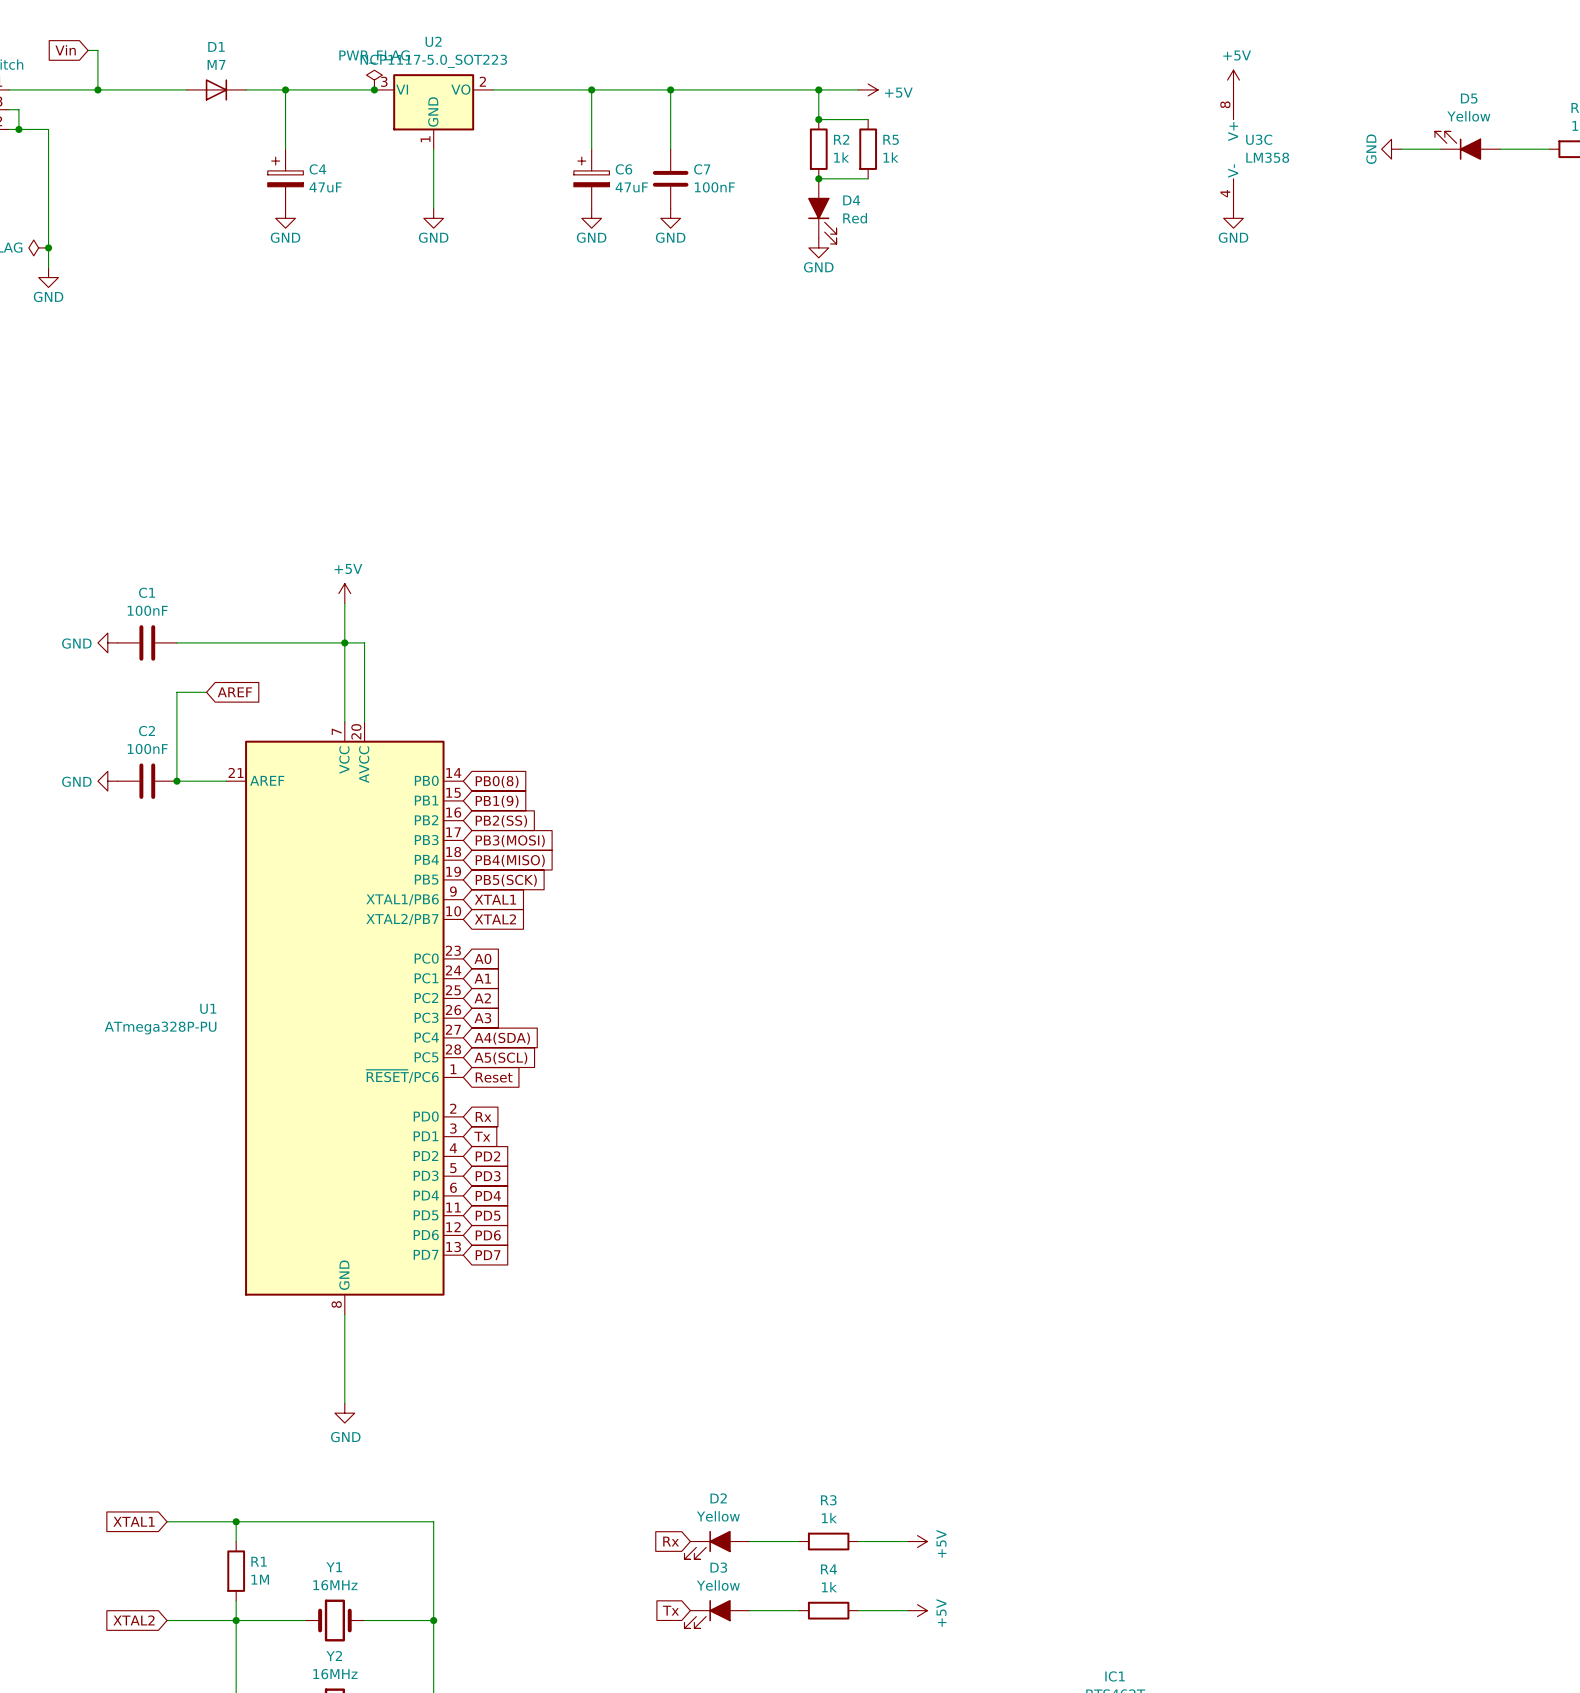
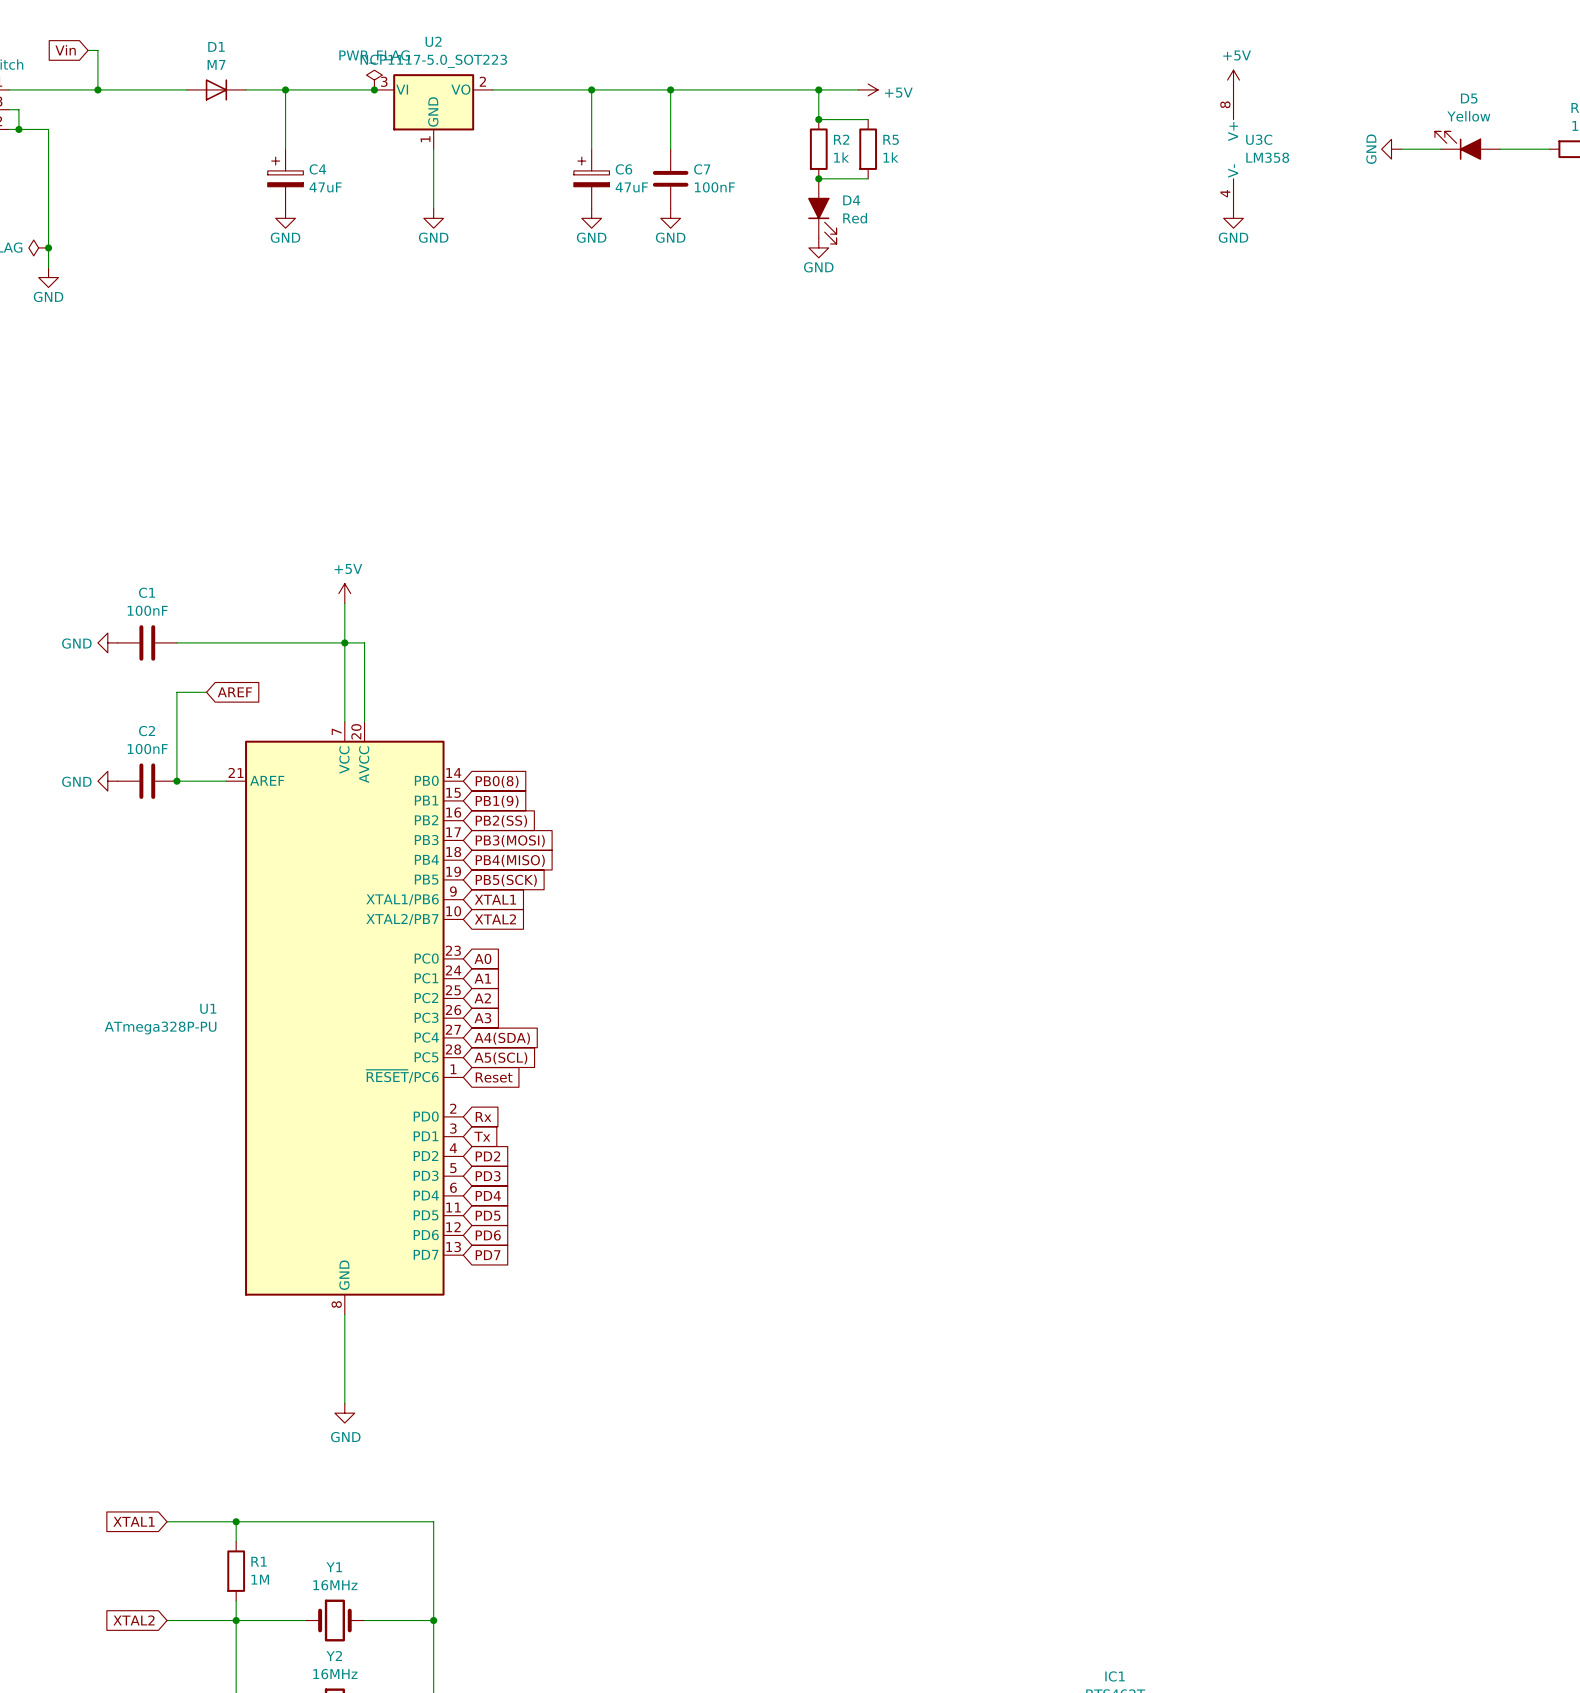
global label: Rx (671, 1541) -> none
wire: (749, 1541) (799, 1541) -> none
R3: 1k (828, 1541) -> none
wire: (858, 1541) (907, 1541) -> none
power symbol: +5V (917, 1541) -> none
D2: Yellow (717, 1545) -> none
global label: Tx (670, 1610) -> none
wire: (749, 1610) (799, 1610) -> none
R4: 1k (828, 1610) -> none
wire: (858, 1610) (907, 1610) -> none
power symbol: +5V (917, 1610) -> none
D3: Yellow (717, 1614) -> none

